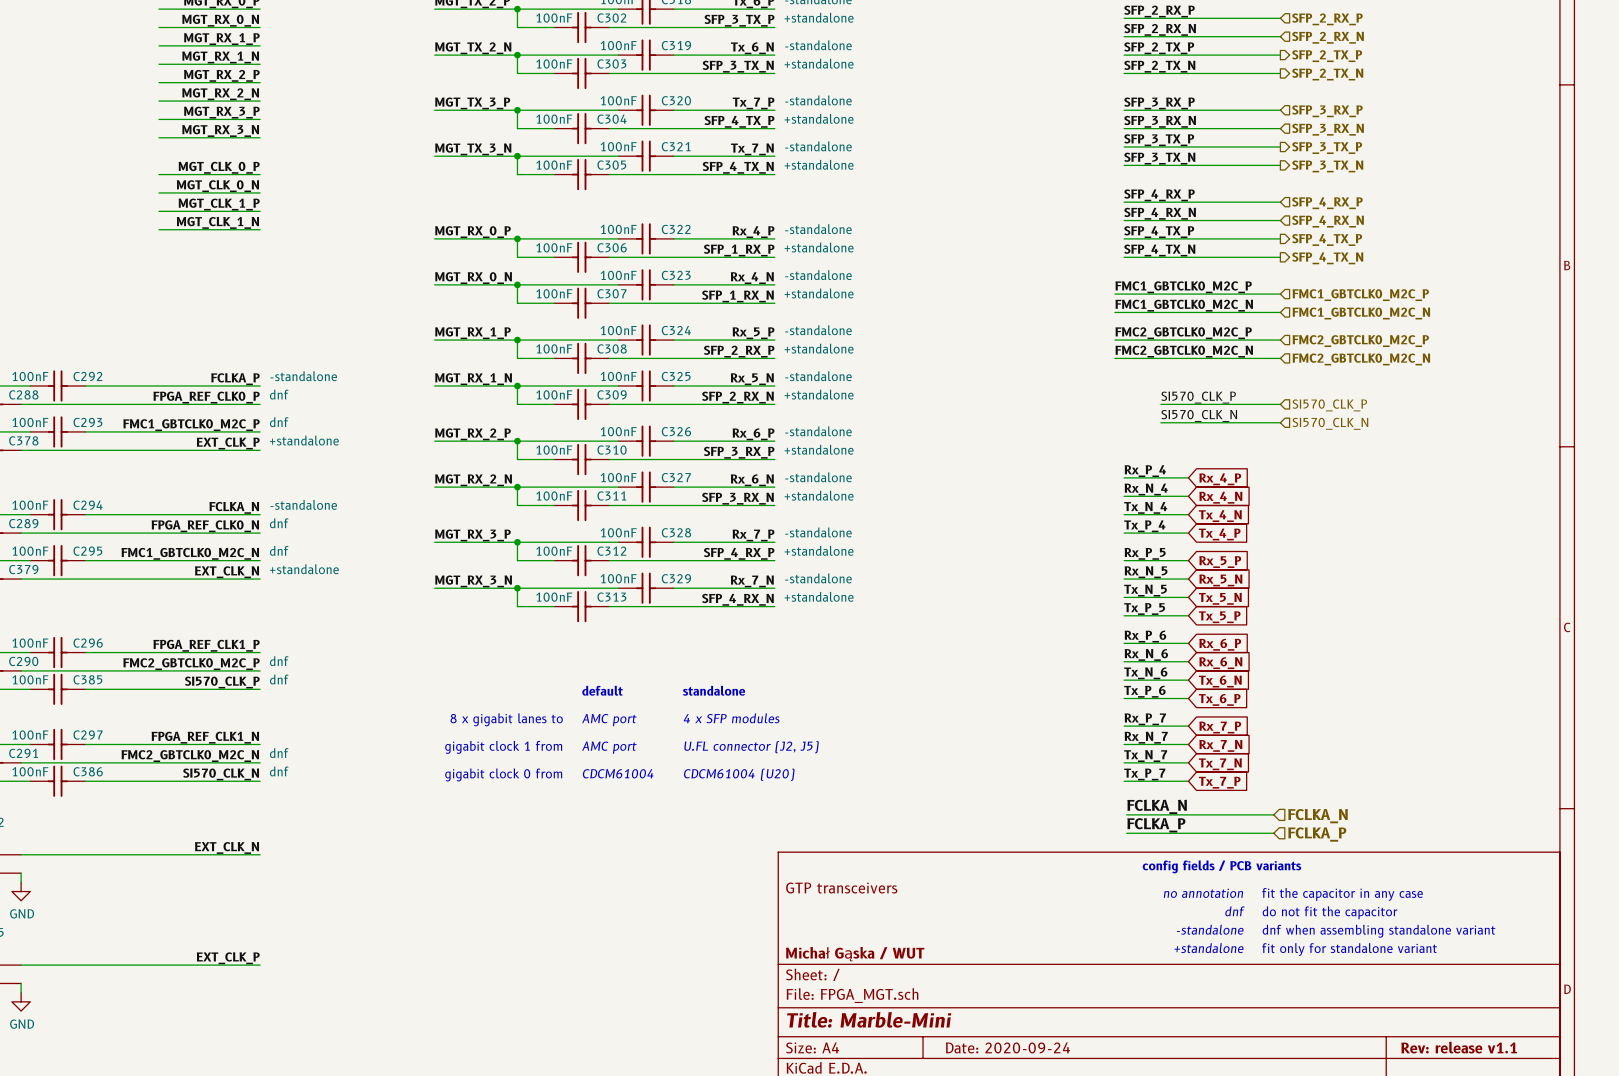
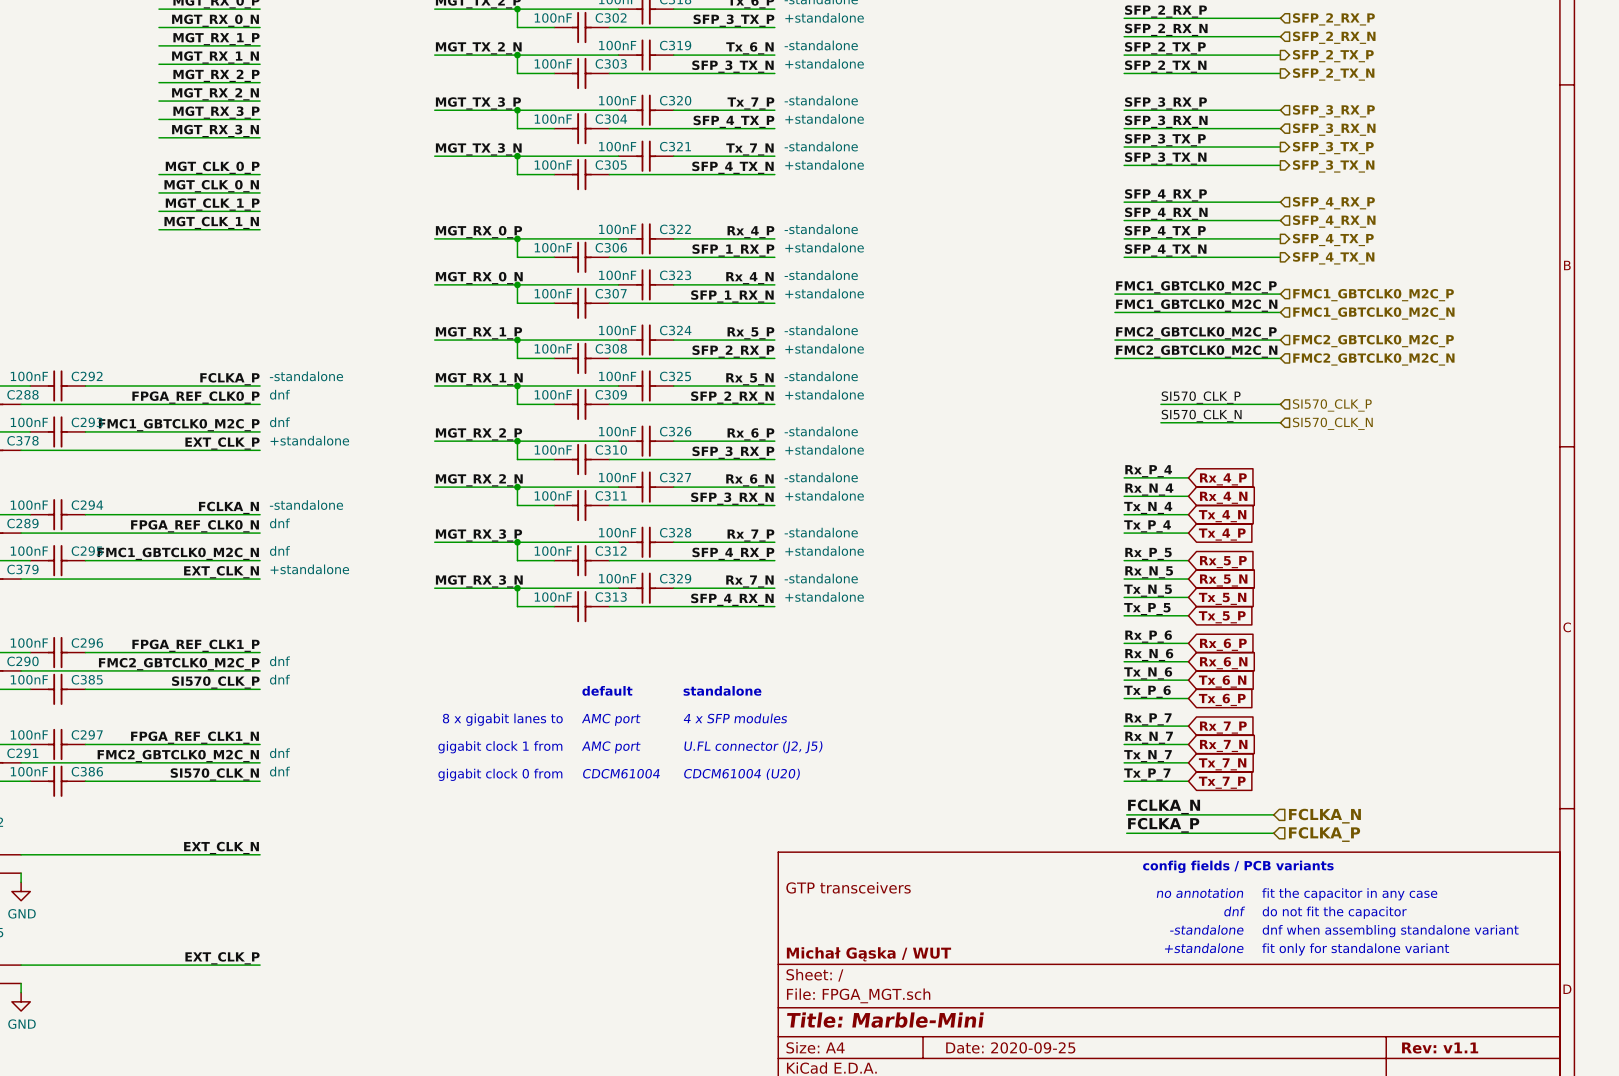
title block: Date: 2020-09-24 (1008, 1047) -> Date: 2020-09-25 (1010, 1047)
title block: Rev: release v1.1 (1459, 1047) -> Rev: v1.1 (1440, 1048)

